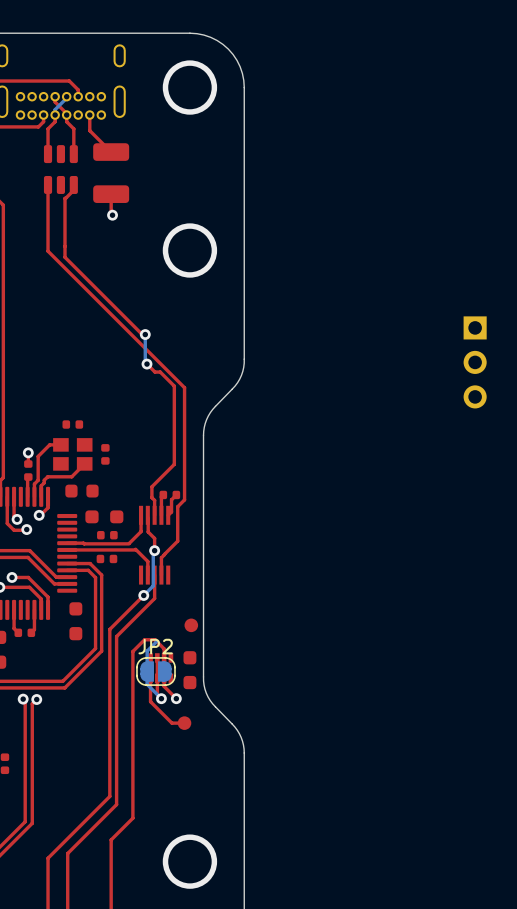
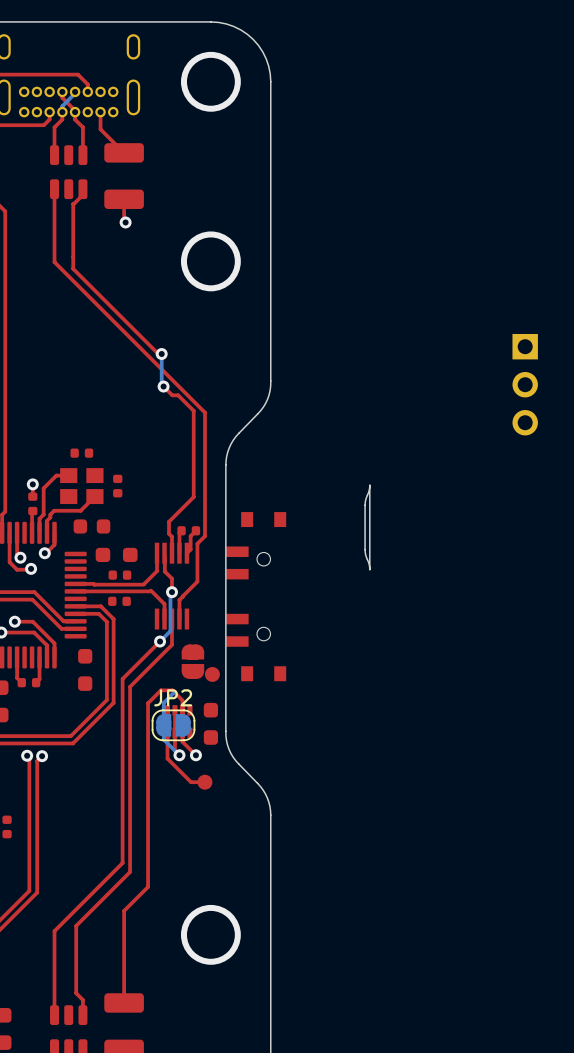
board edge: none -> (369, 485) (369, 569) (365, 549) (365, 502) (369, 485)
part: none -> (256, 596)
part: none -> (192, 661)

